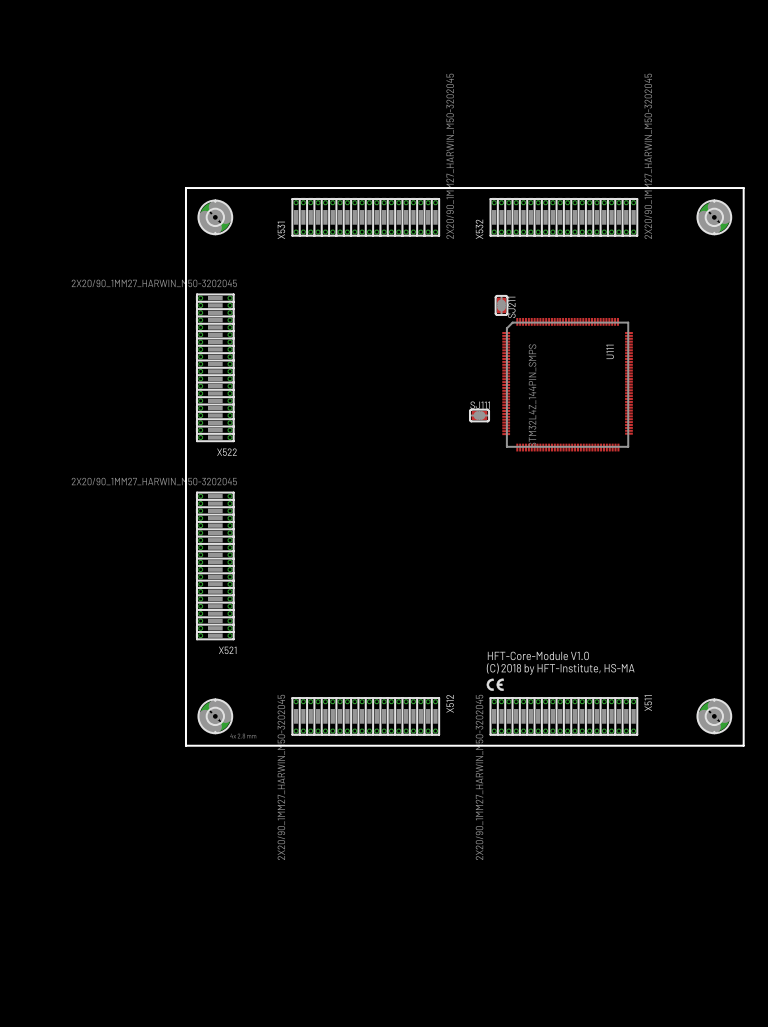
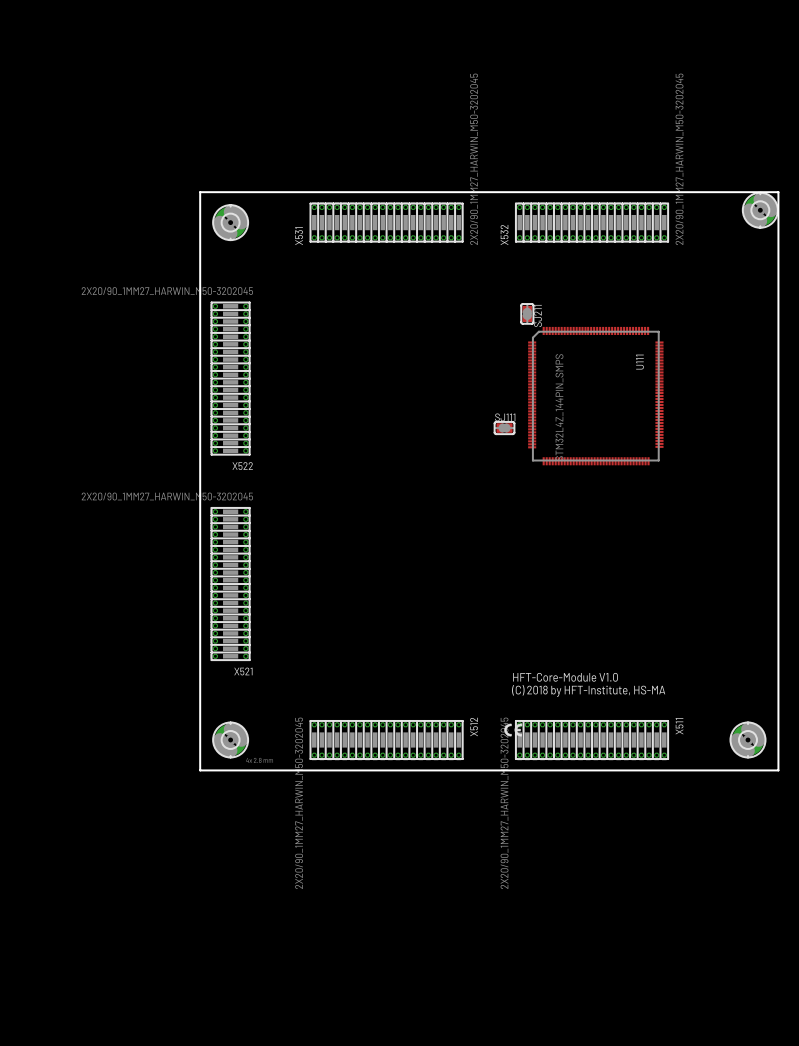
part position: (714, 217) -> (760, 210)
drawing position: (490, 684) -> (507, 730)
drawing position: (500, 684) -> (518, 730)

